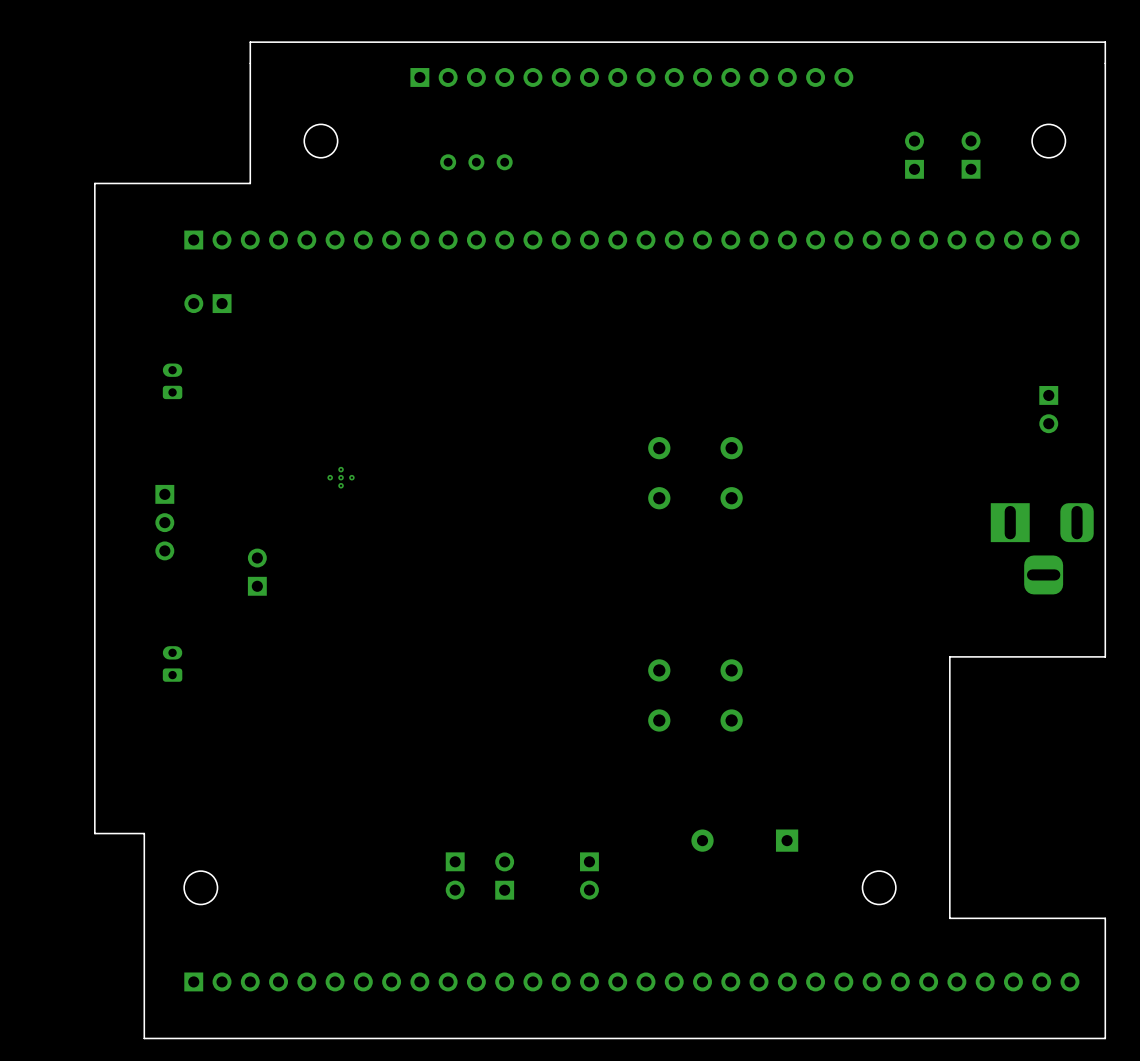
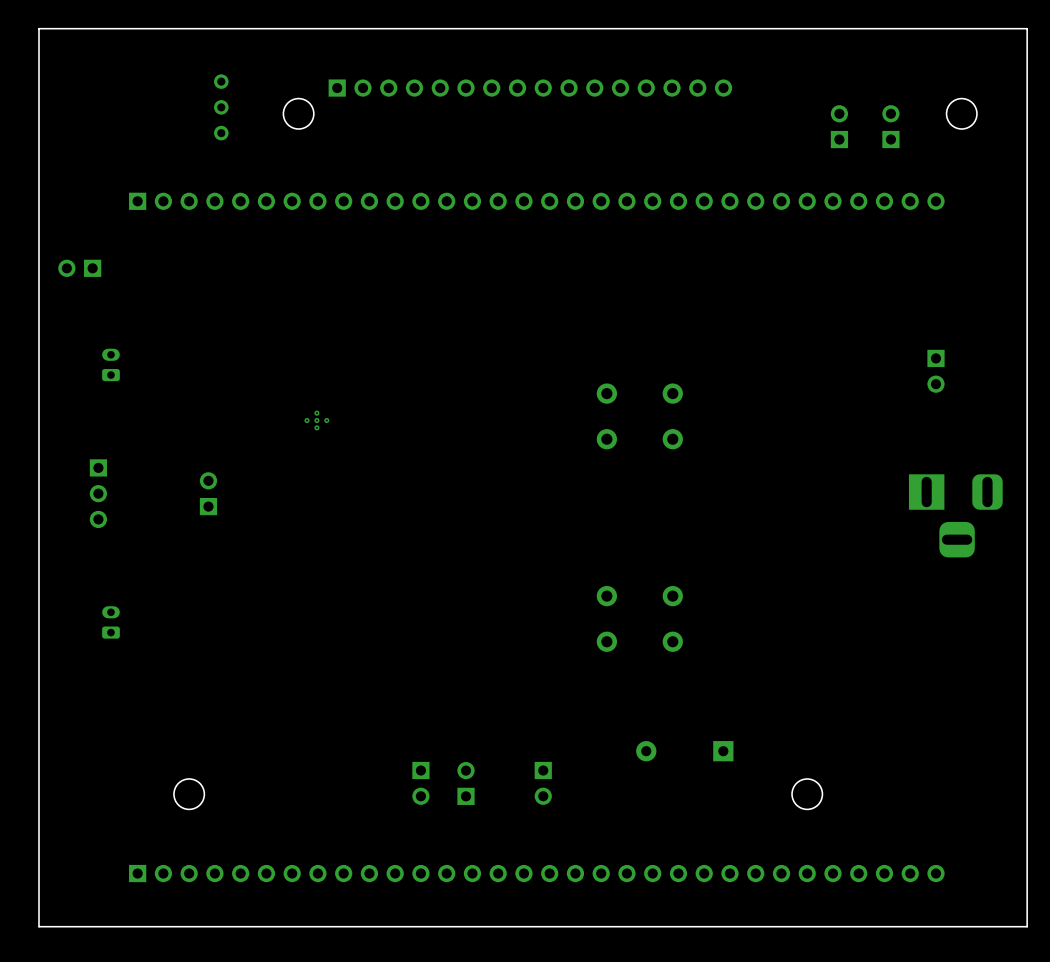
board edge: (1105, 42) (250, 42) (250, 183) (94, 183) (94, 833) (144, 833) (144, 1038) (1105, 1038) (1105, 918) (949, 918) (949, 656) (1105, 656) (1105, 42) -> (1027, 28) (1027, 926) (39, 926) (39, 28) (1027, 28)
part position: (631, 77) -> (530, 88)
part rotation: 0° (476, 162) -> 90° clockwise (221, 107)
part position: (476, 162) -> (221, 107)
part position: (631, 239) -> (536, 201)
part: (207, 303) -> none
part: none -> (79, 268)
part position: (172, 381) -> (110, 364)
part position: (1048, 409) -> (936, 371)
part position: (164, 522) -> (98, 493)
part position: (1042, 548) -> (955, 515)
part position: (257, 572) -> (208, 493)
part position: (172, 663) -> (110, 622)
part position: (631, 981) -> (536, 873)

